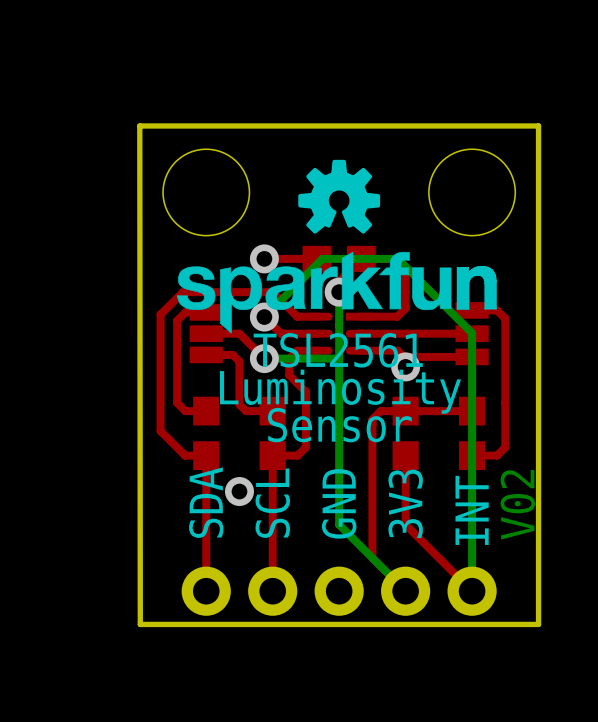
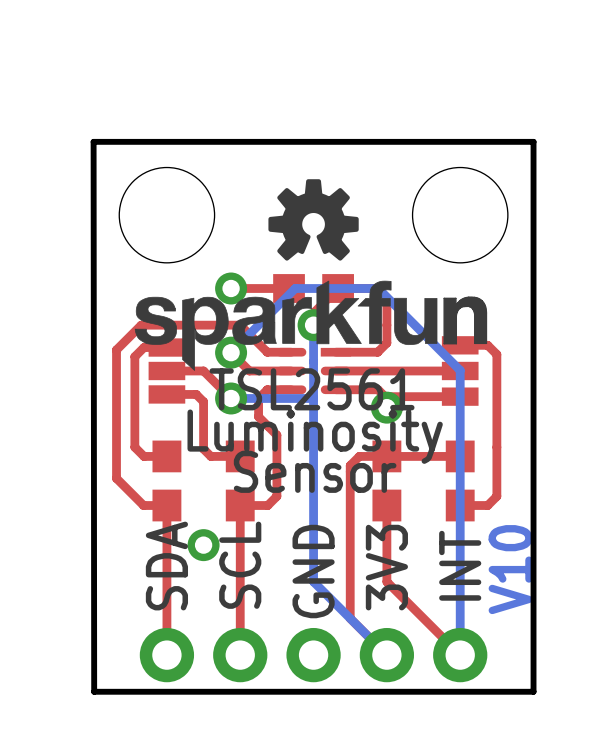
text: V02 (517, 504) -> V10 (510, 569)

